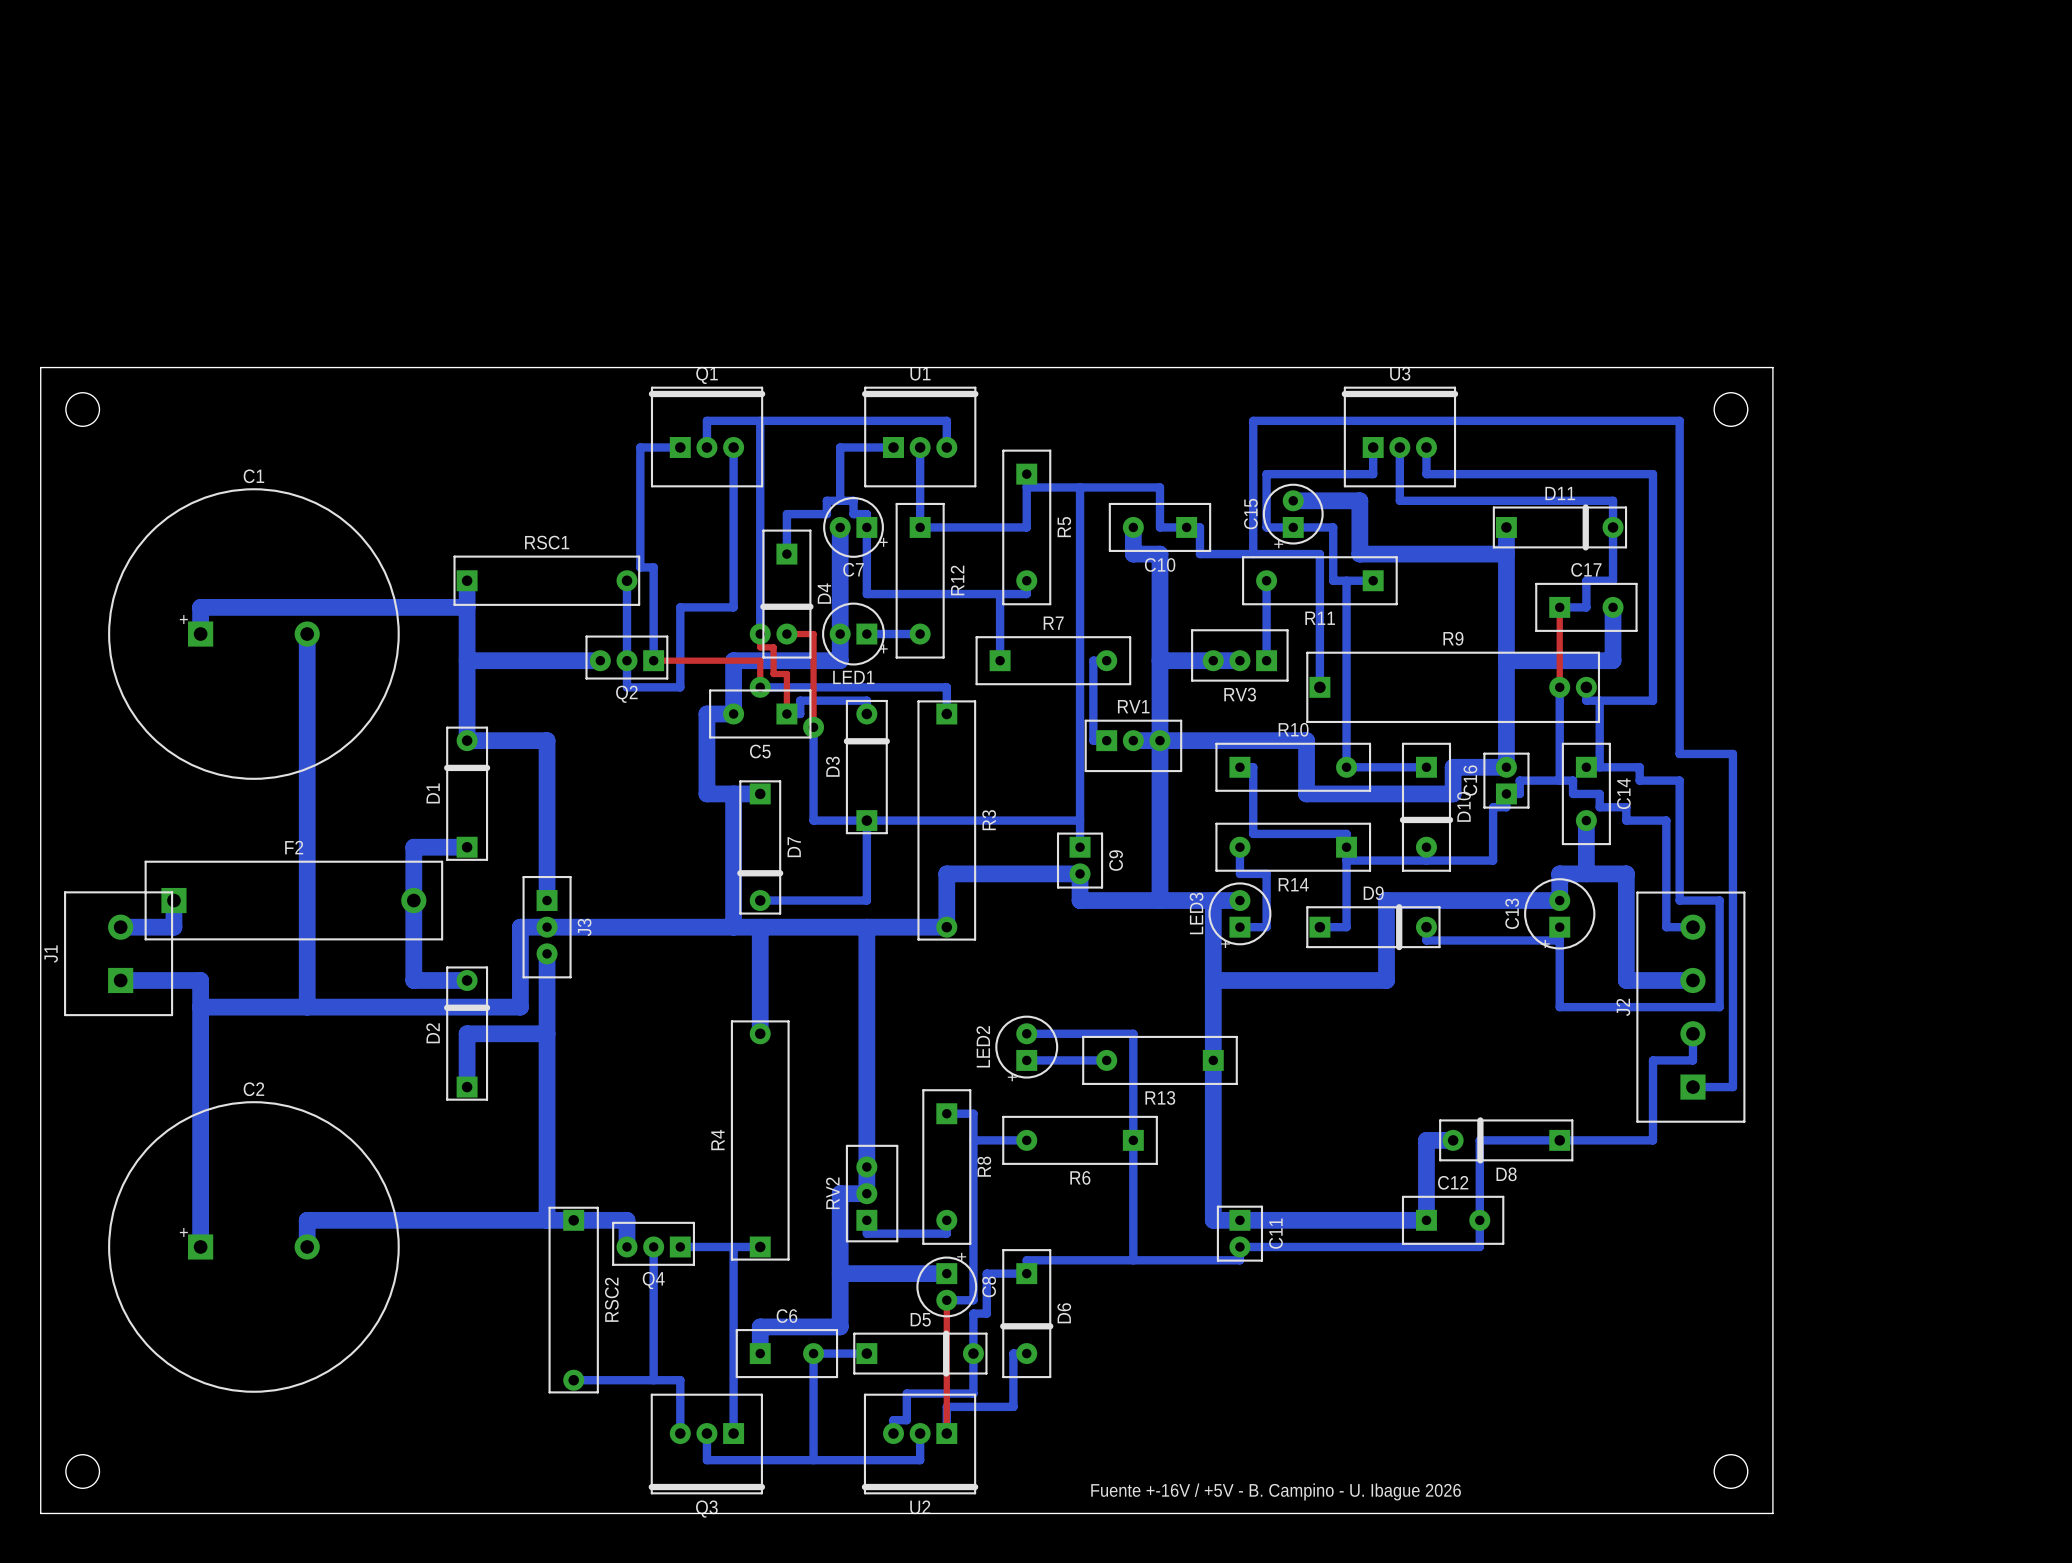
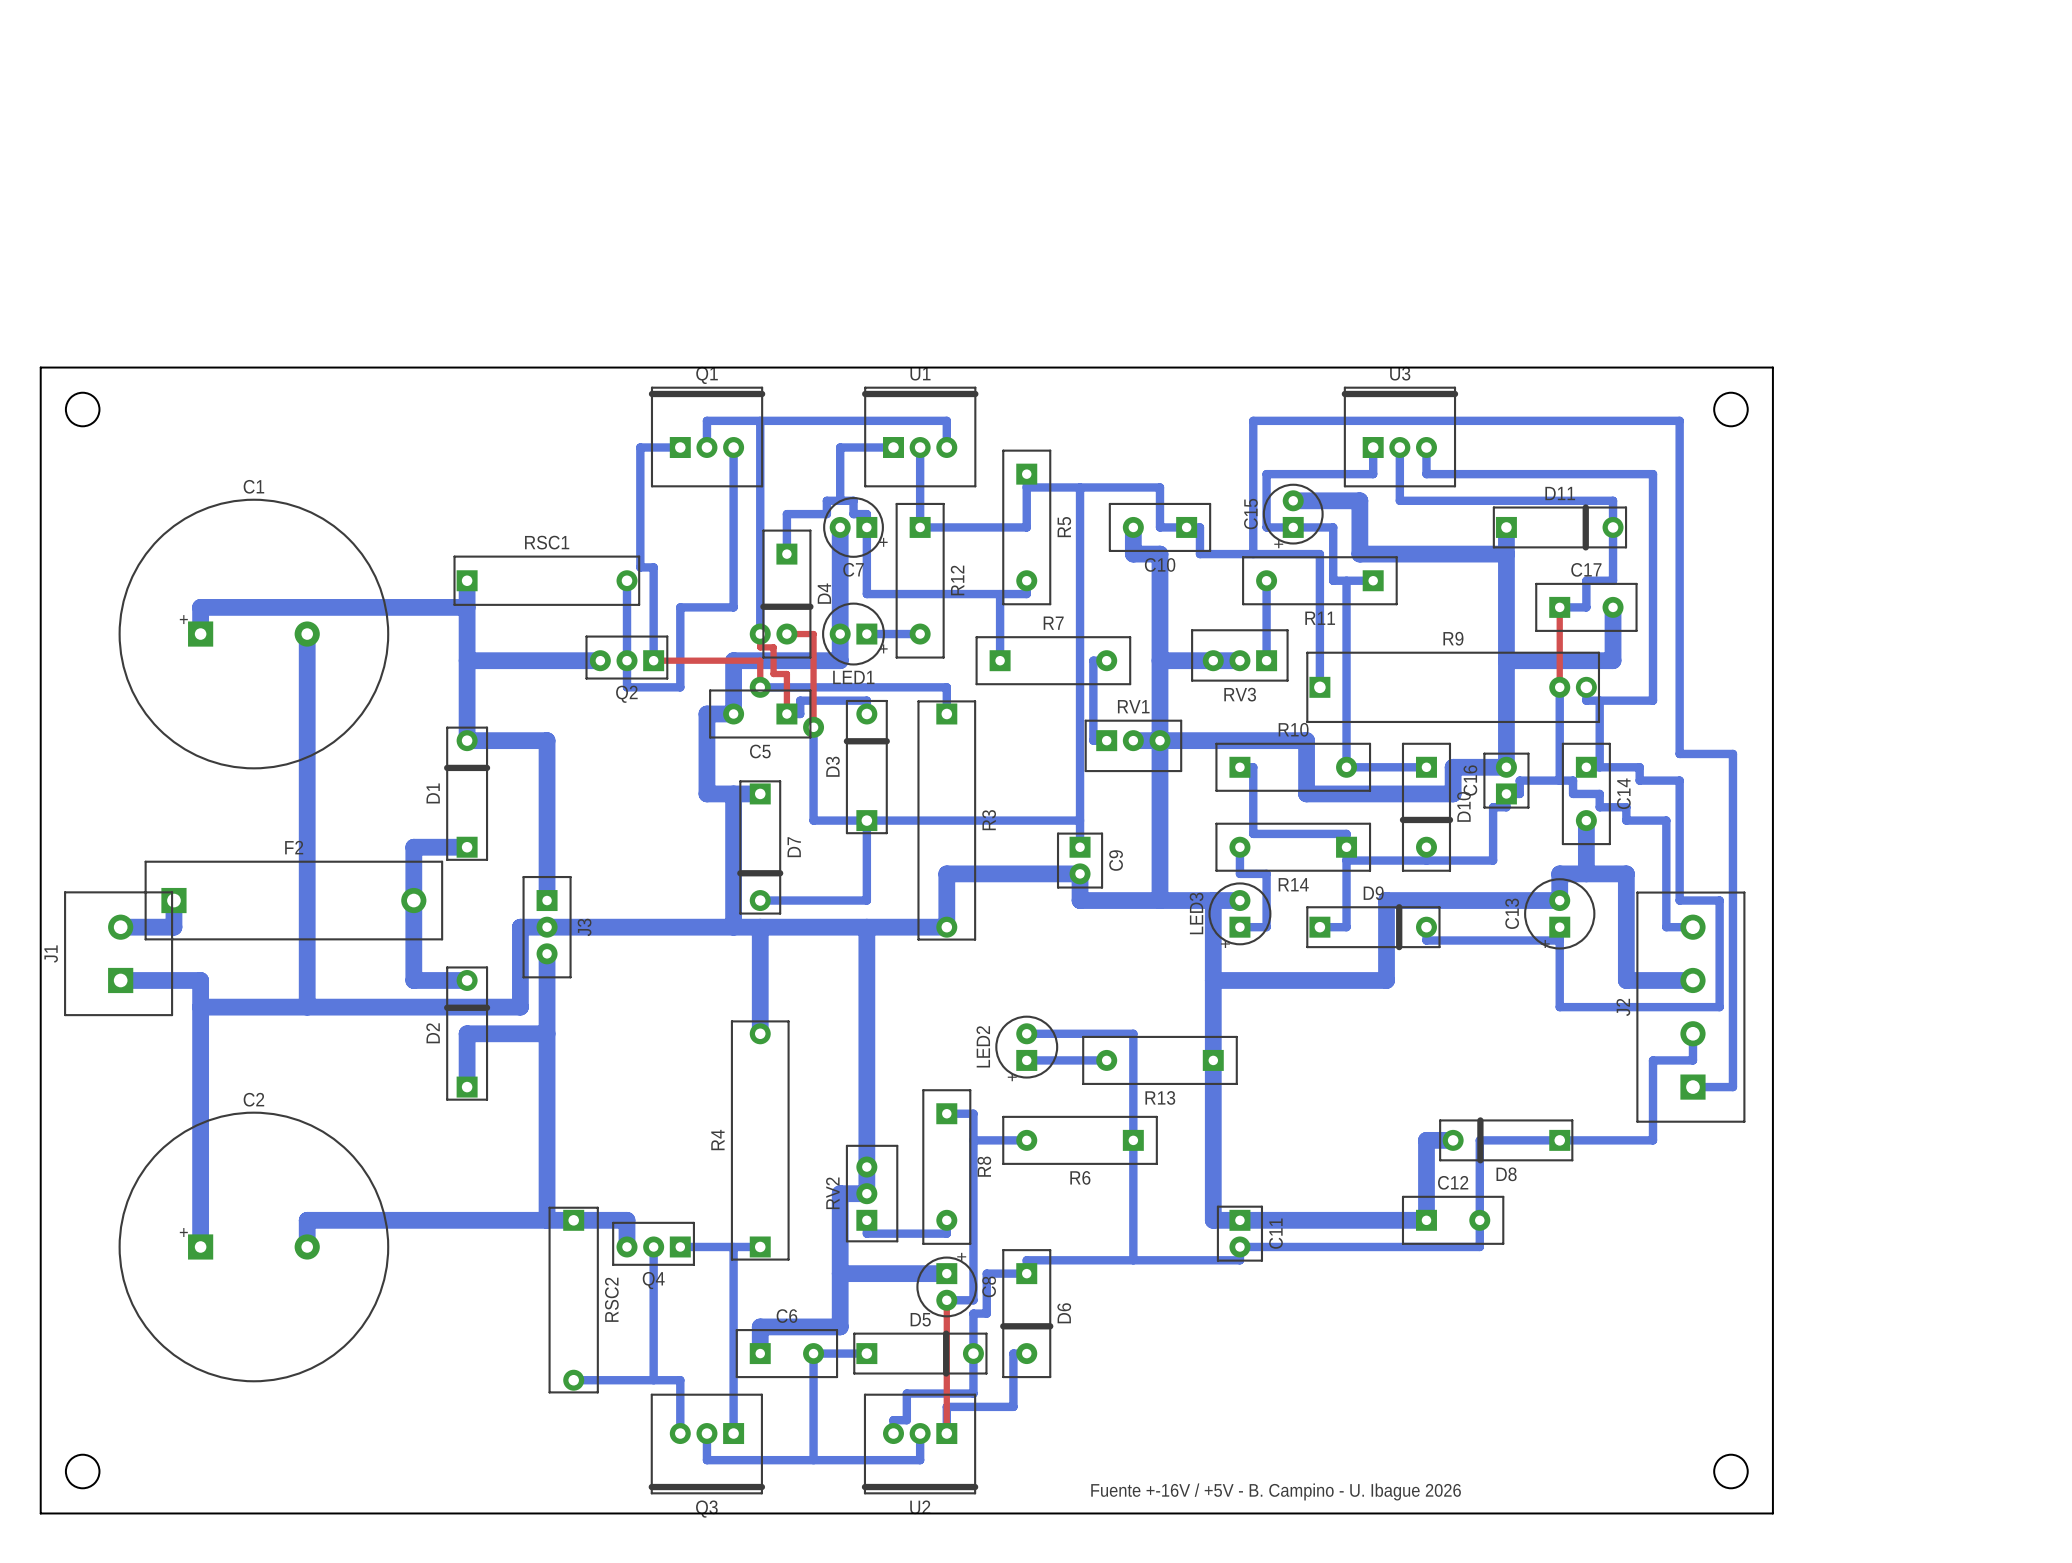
C1 footprint: [108, 488, 400, 780] -> [118, 498, 390, 770]
C2 footprint: [108, 1101, 400, 1393] -> [118, 1111, 390, 1383]

